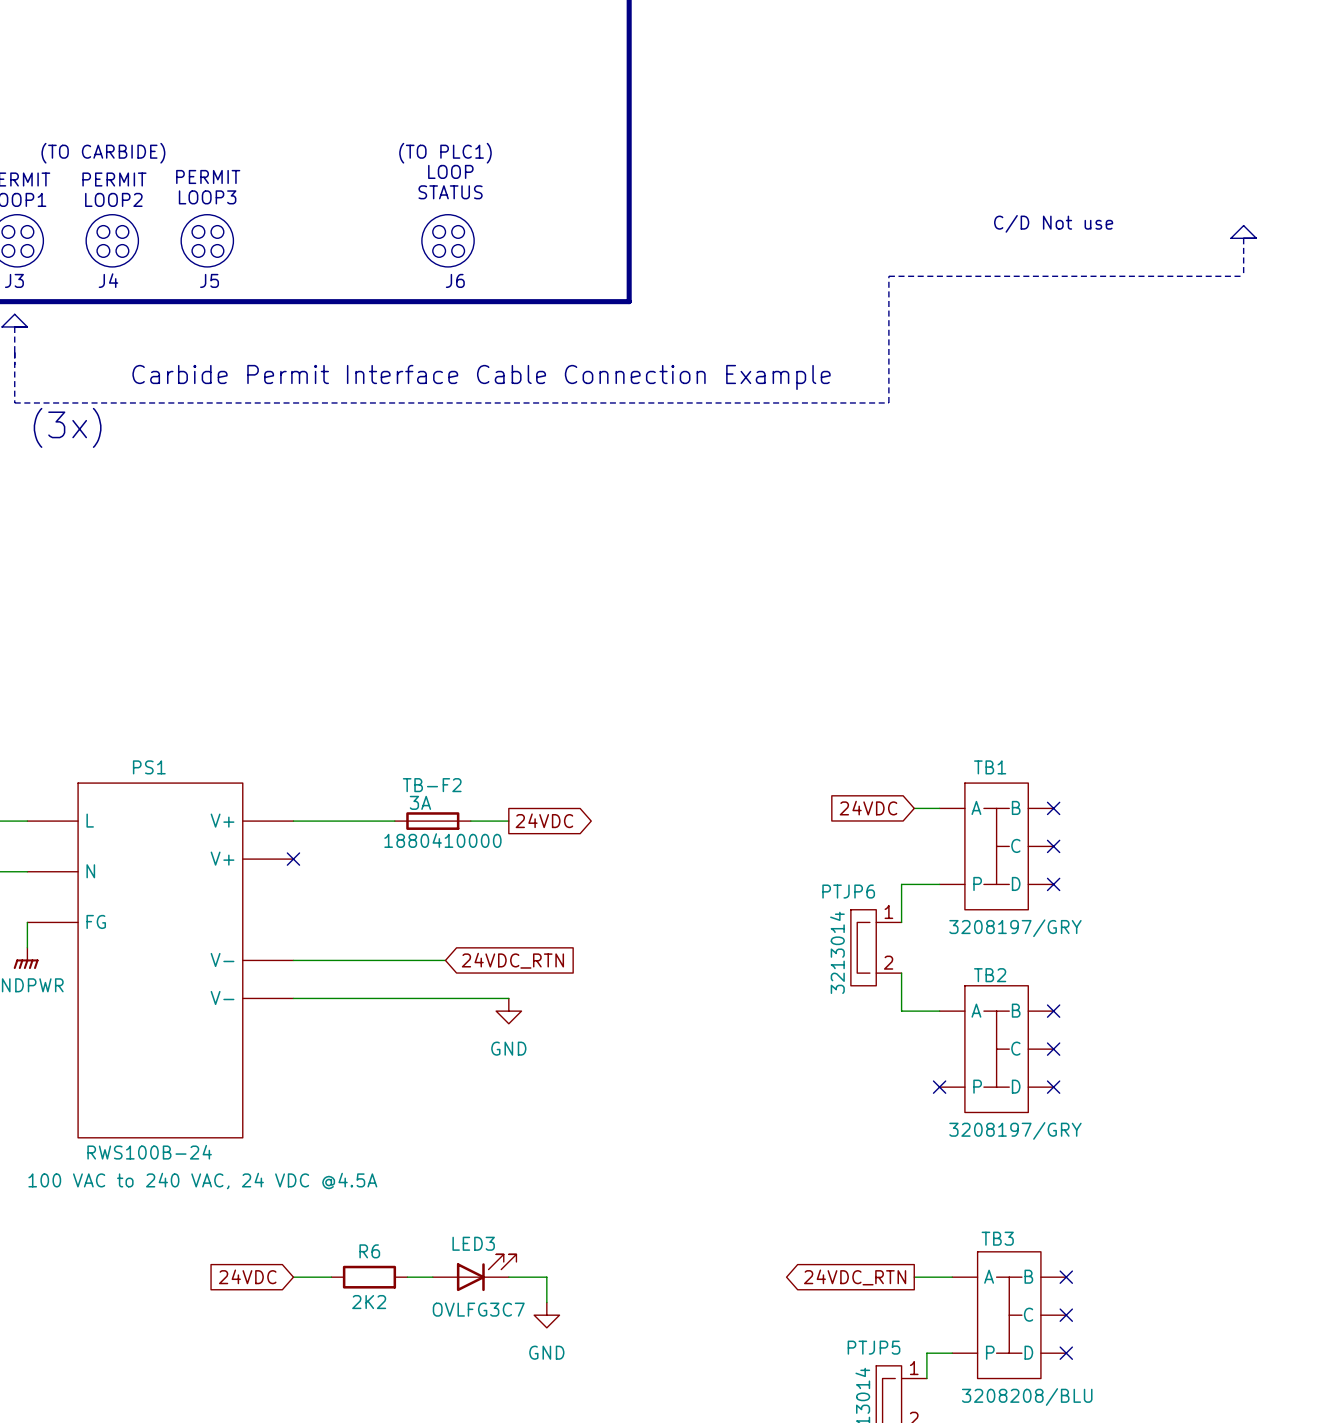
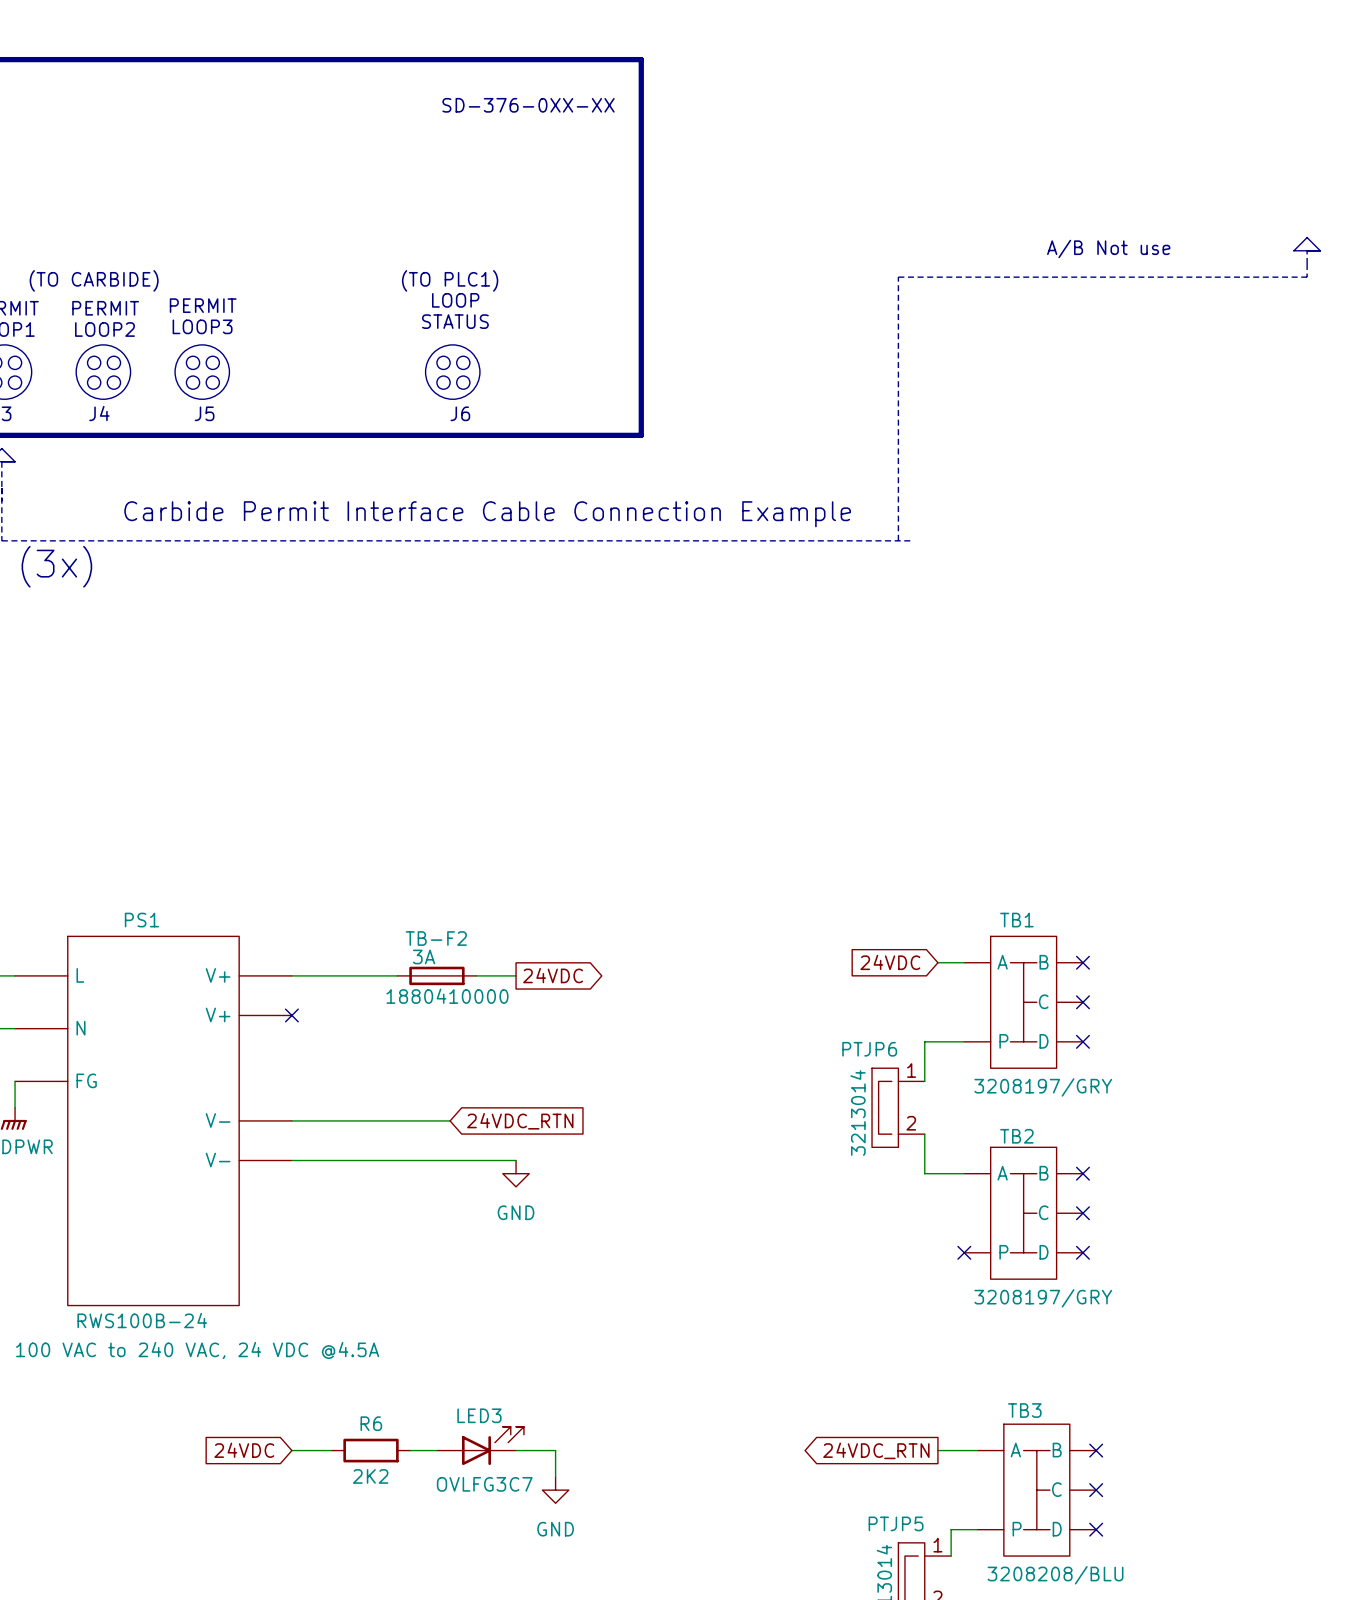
text: none -> A/B Not use (1108, 248)
line: none -> (1307, 250) (1307, 277) (898, 277) (898, 540)
text: C/D Not use (1053, 223) -> none
line: (1243, 225) (1230, 238) (1256, 238) (1243, 225) -> (1307, 237) (1293, 250) (1320, 250) (1307, 237)
line: (1243, 238) (1243, 276) (888, 276) (888, 402) -> none

